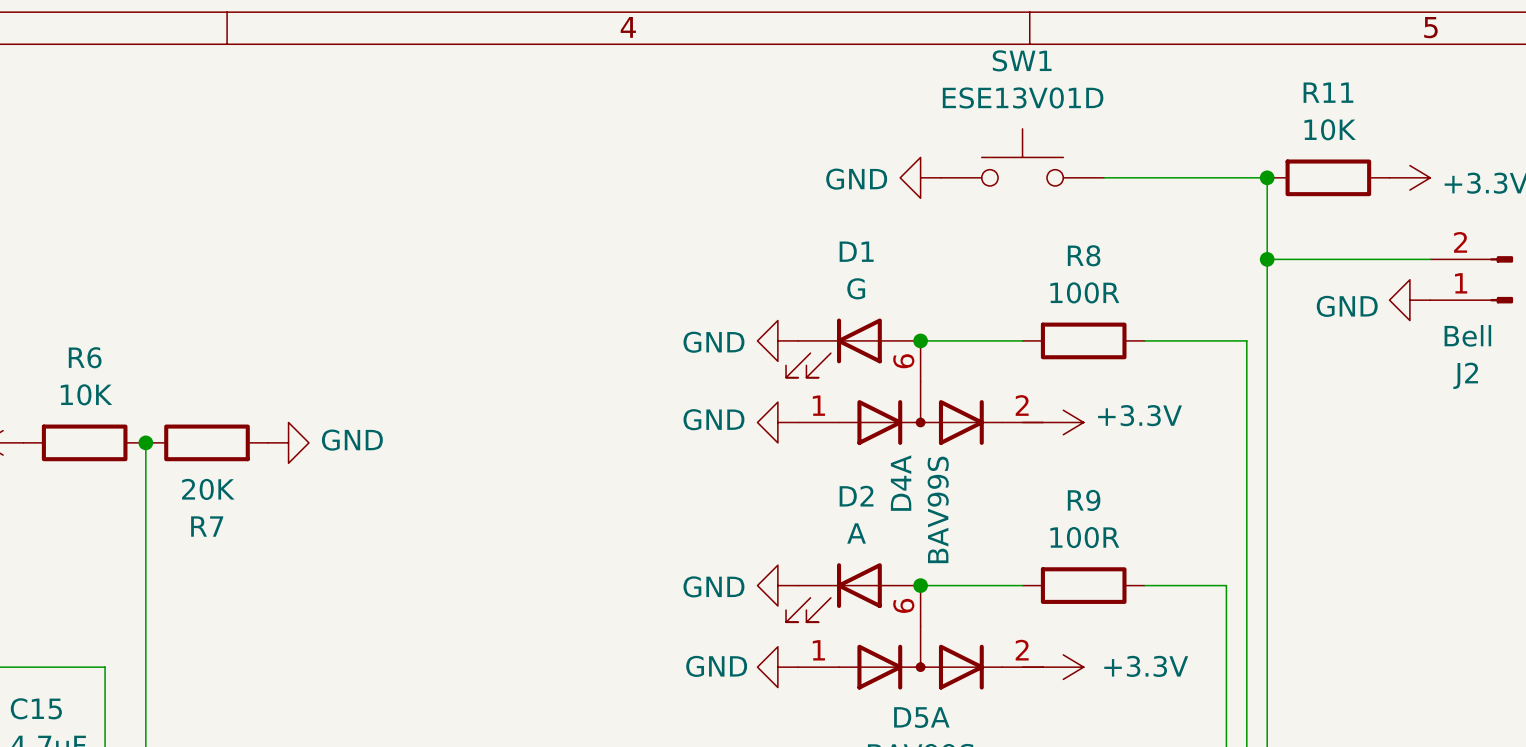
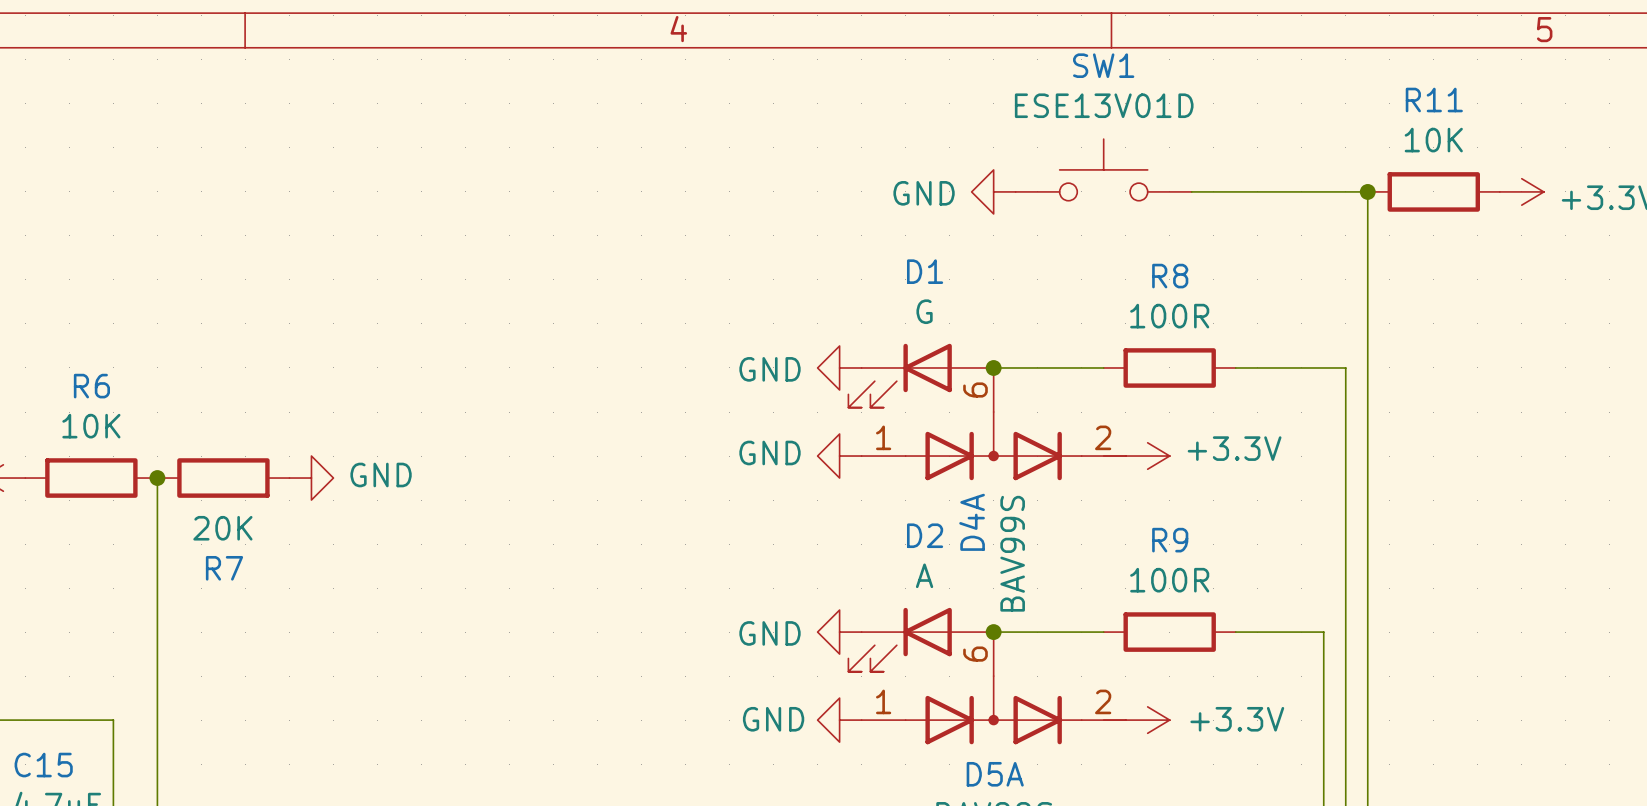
wire: (1267, 259) (1430, 259) -> none
junction: (1267, 259) -> none
J2: Bell (1471, 279) -> none
power symbol: GND (1409, 300) -> none

